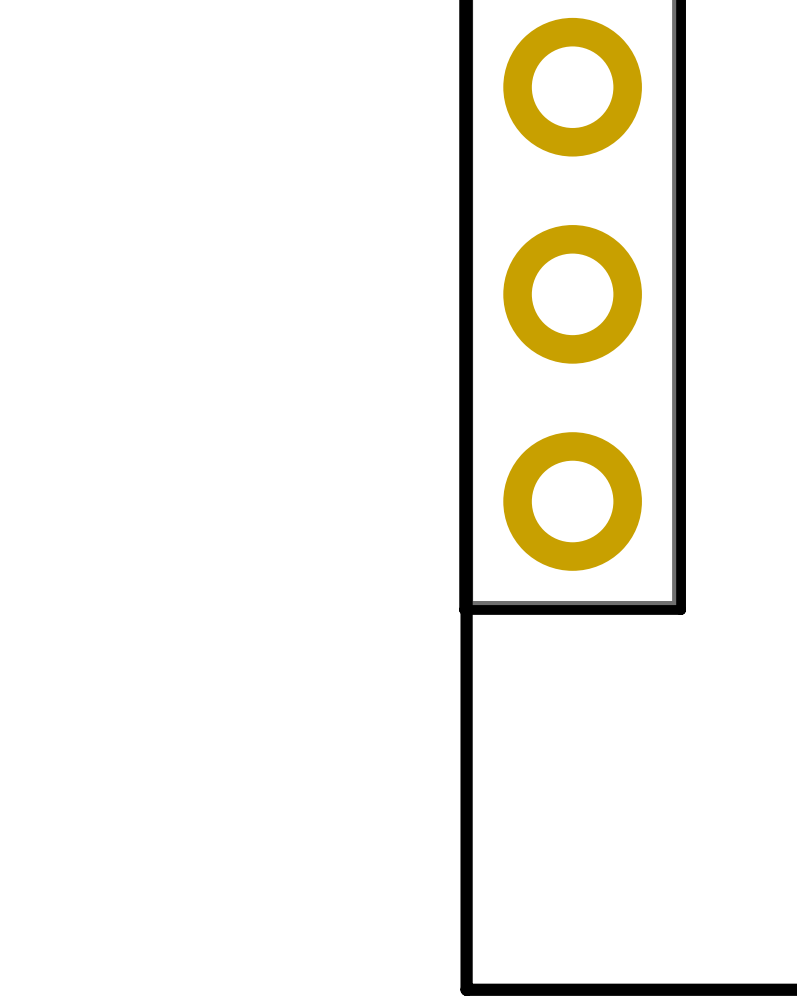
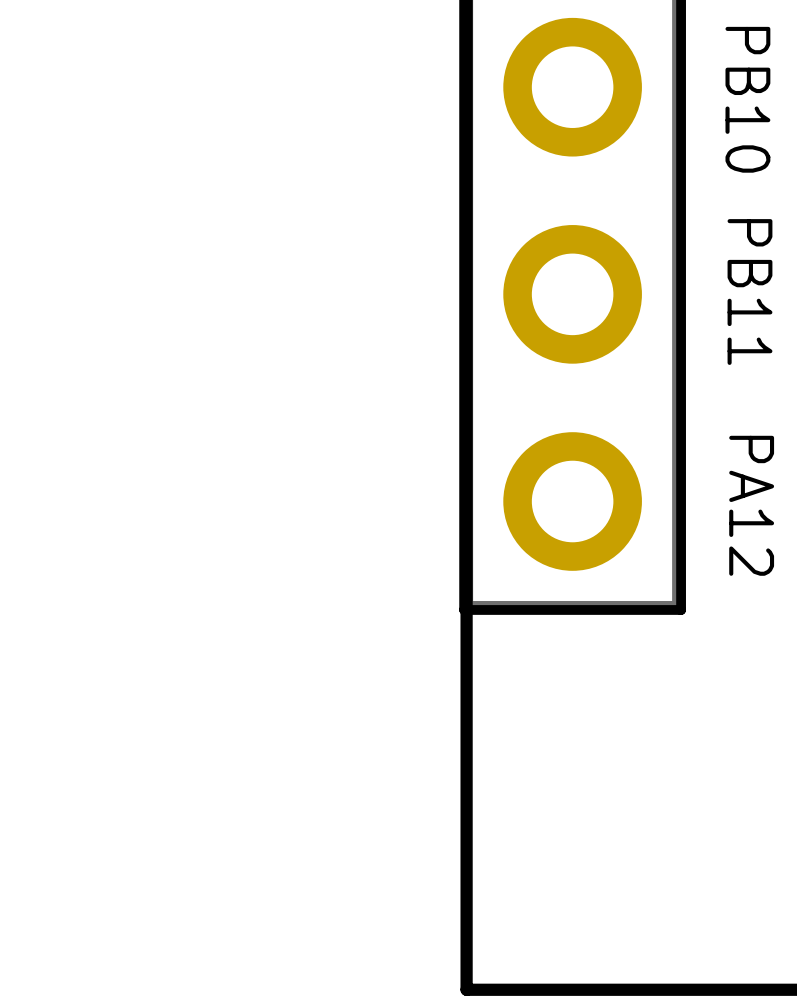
text: none -> PB10 (747, 99)
text: none -> PB11 (749, 292)
text: none -> PA12 (751, 505)

